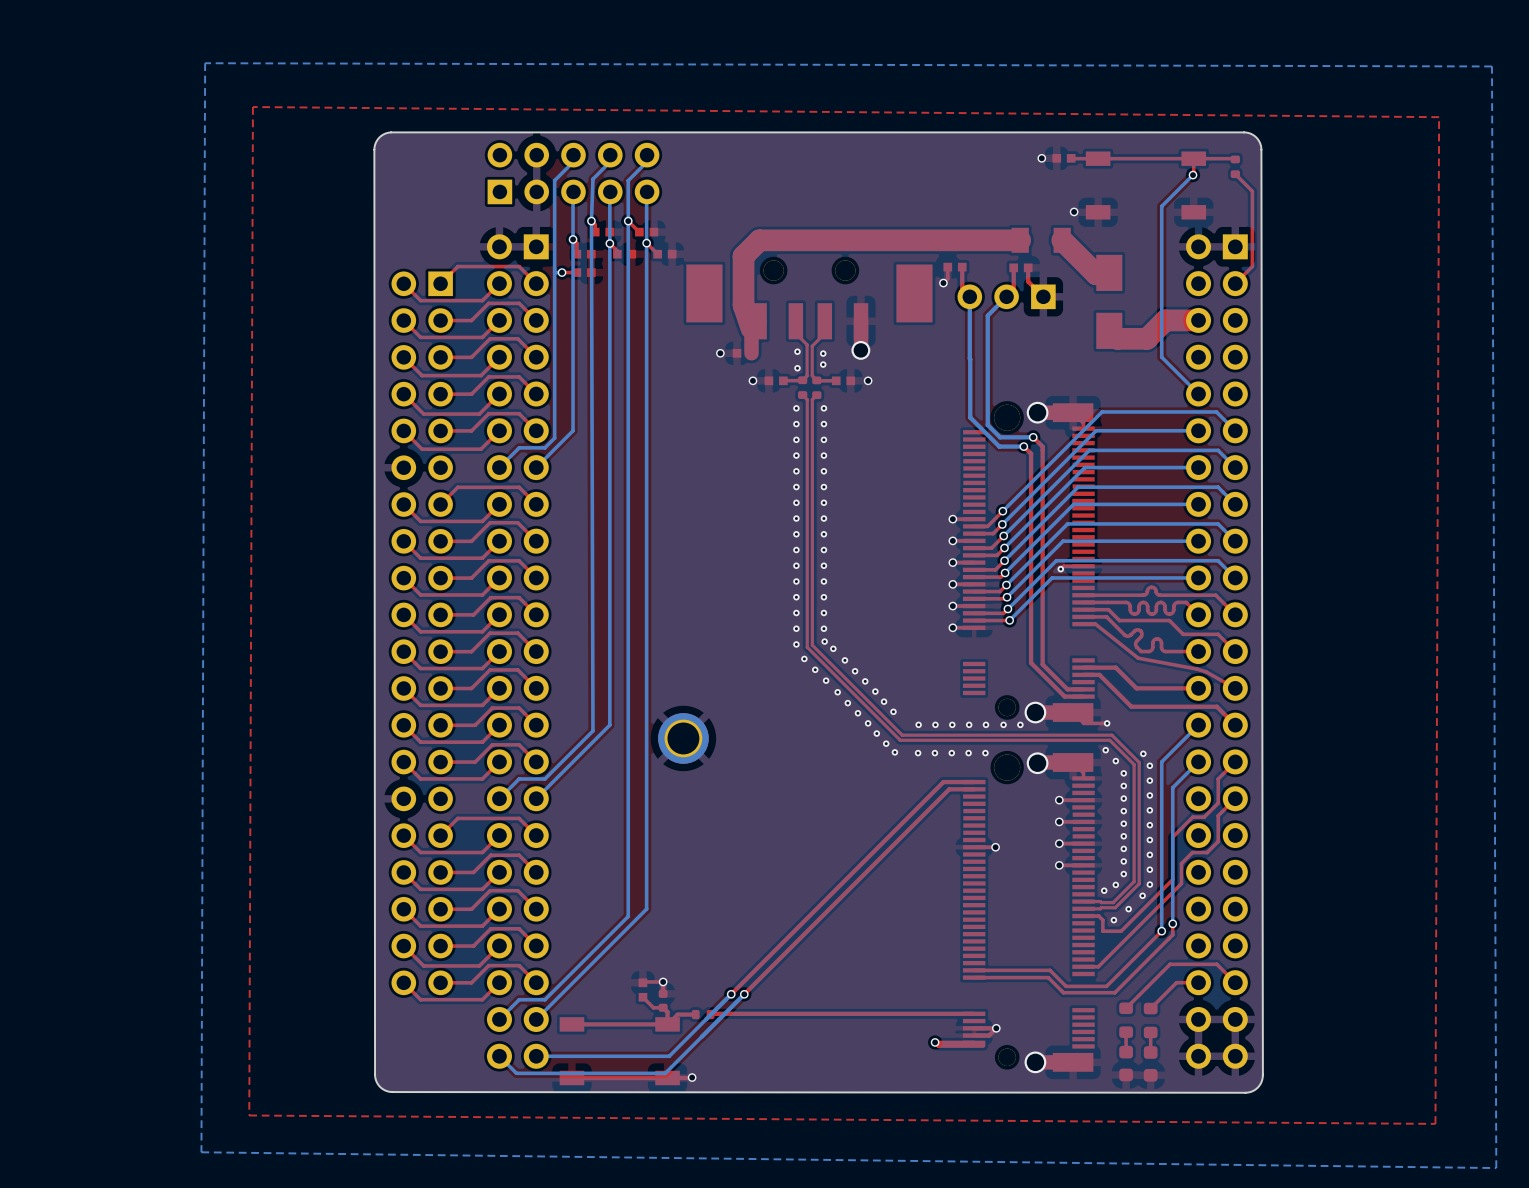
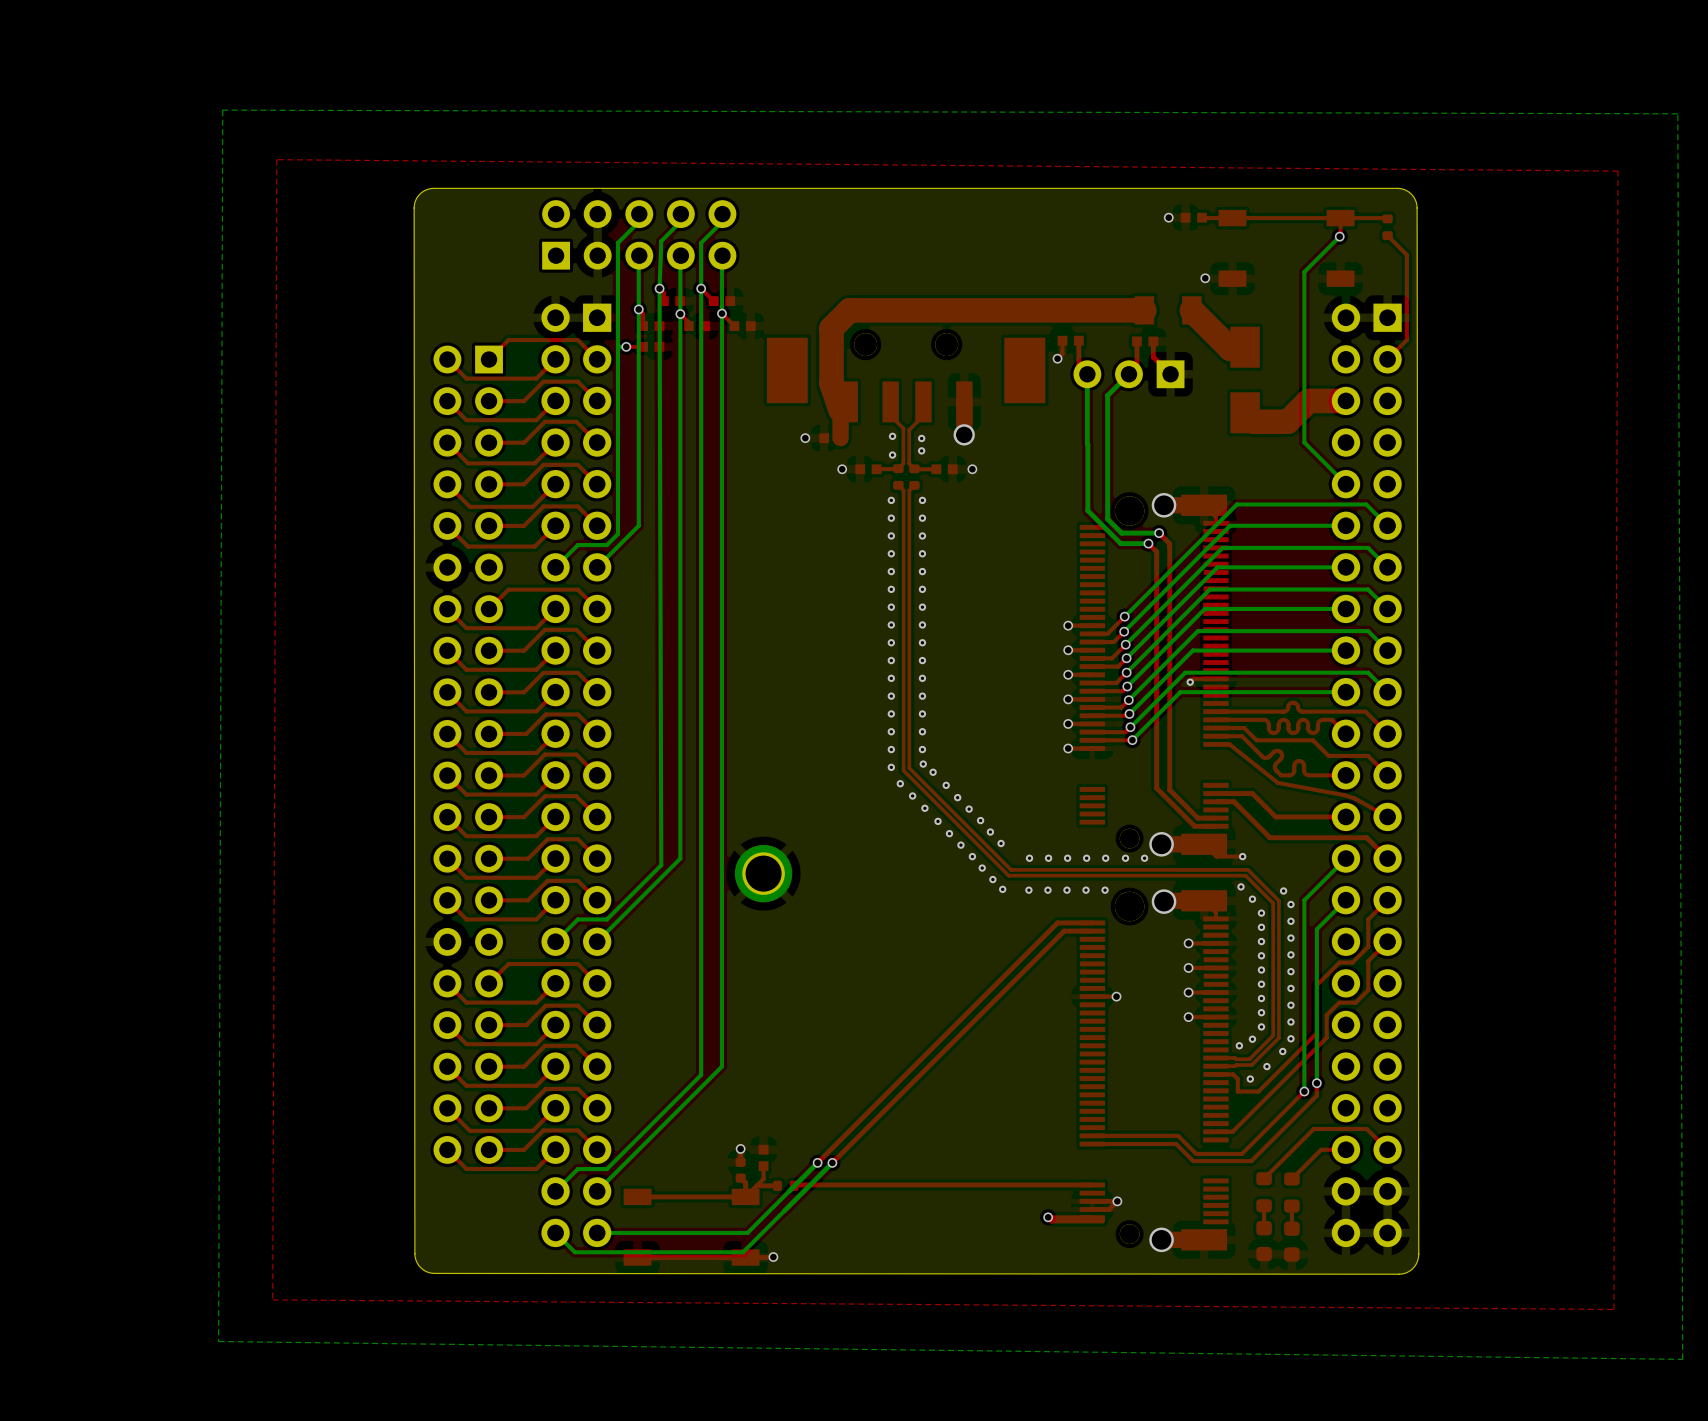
top track: (663, 981) (642, 982) -> none
part position: (642, 990) -> (763, 1157)
top track: (642, 997) (653, 1007) (663, 1007) -> none
top track: none -> (763, 1166) (763, 1179) (756, 1185)

